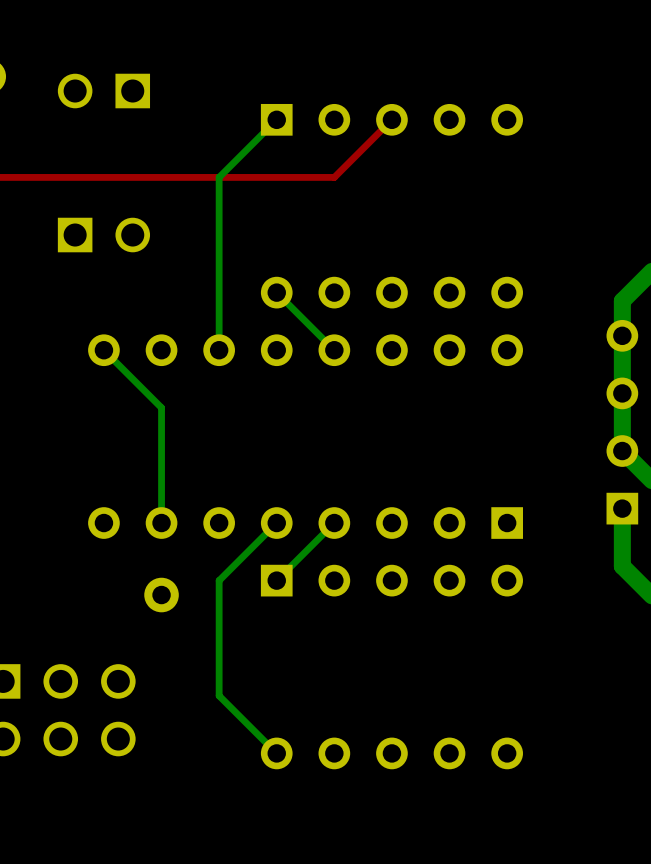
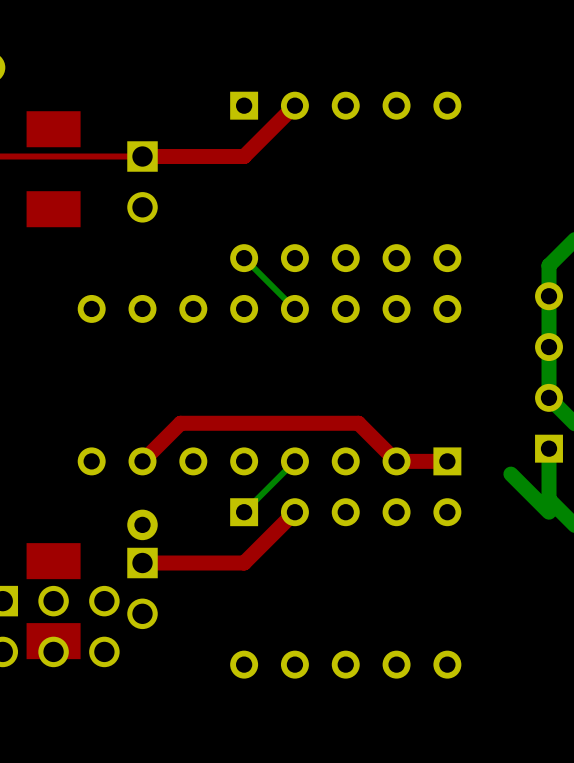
part: (103, 91) -> none
bottom track: (276, 119) (219, 177) (219, 350) -> none
top track: (391, 119) (334, 177) (276, 177) -> (294, 105) (244, 156)
top track width: thin (276, 177) (161, 177) -> thick (244, 156) (142, 156)
part: none -> (53, 169)
part: none -> (142, 181)
part: (103, 235) -> none
bottom track: (103, 350) (161, 407) (161, 523) -> none
bottom track: (276, 523) (219, 580) (219, 695) (276, 753) -> none
top track: none -> (447, 461) (396, 461) (358, 423) (180, 423) (142, 461)
bottom track: none -> (510, 474) (549, 512)
top track: none -> (294, 512) (244, 563) (142, 563)
part: none -> (142, 588)
part: none -> (53, 601)

